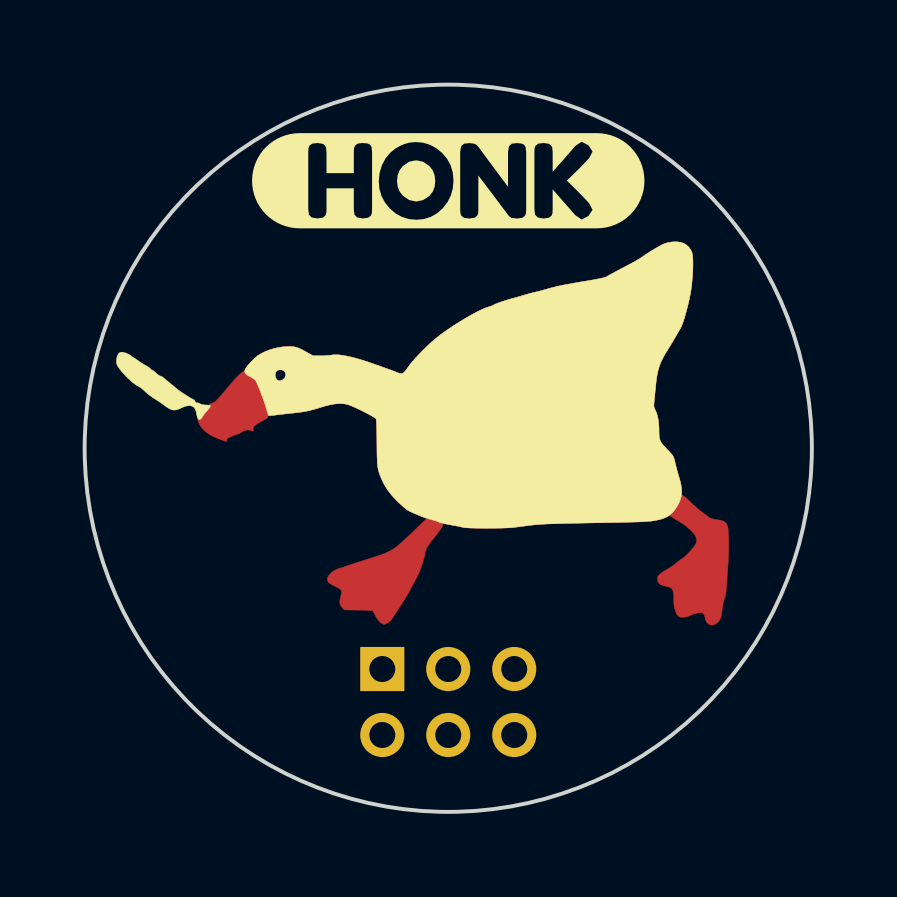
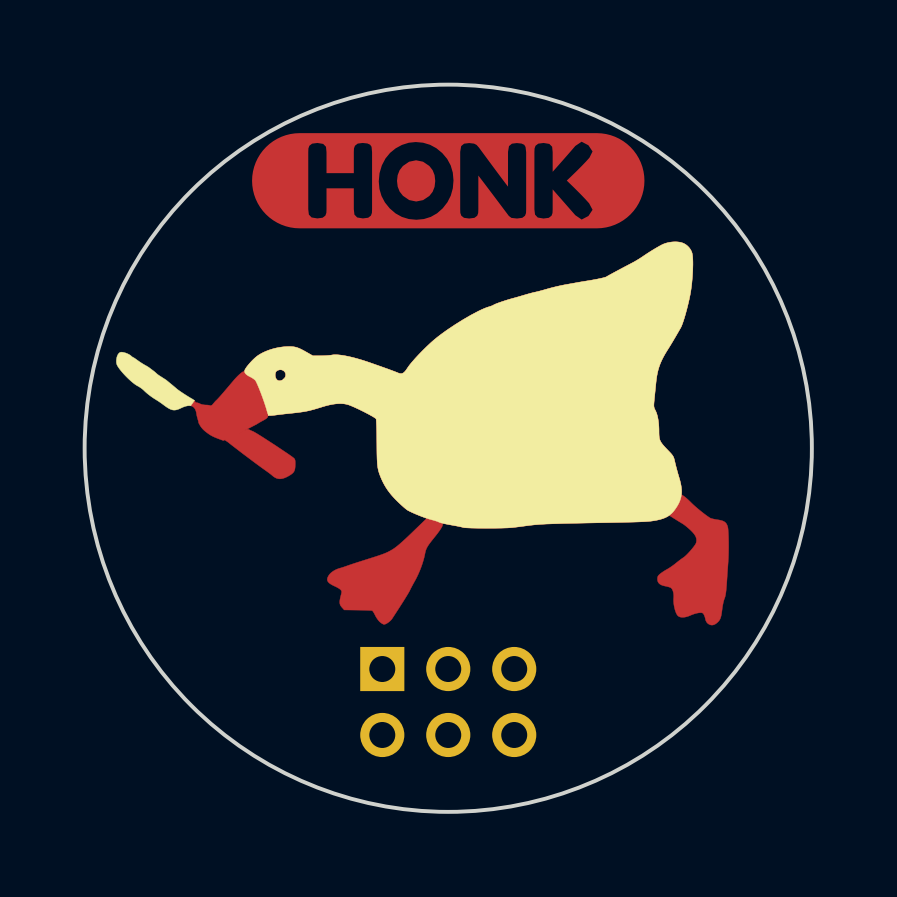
drawing shape: [252, 133, 645, 229] -> [252, 133, 645, 229]
drawing shape: [116, 241, 729, 626] -> [116, 241, 729, 626]

